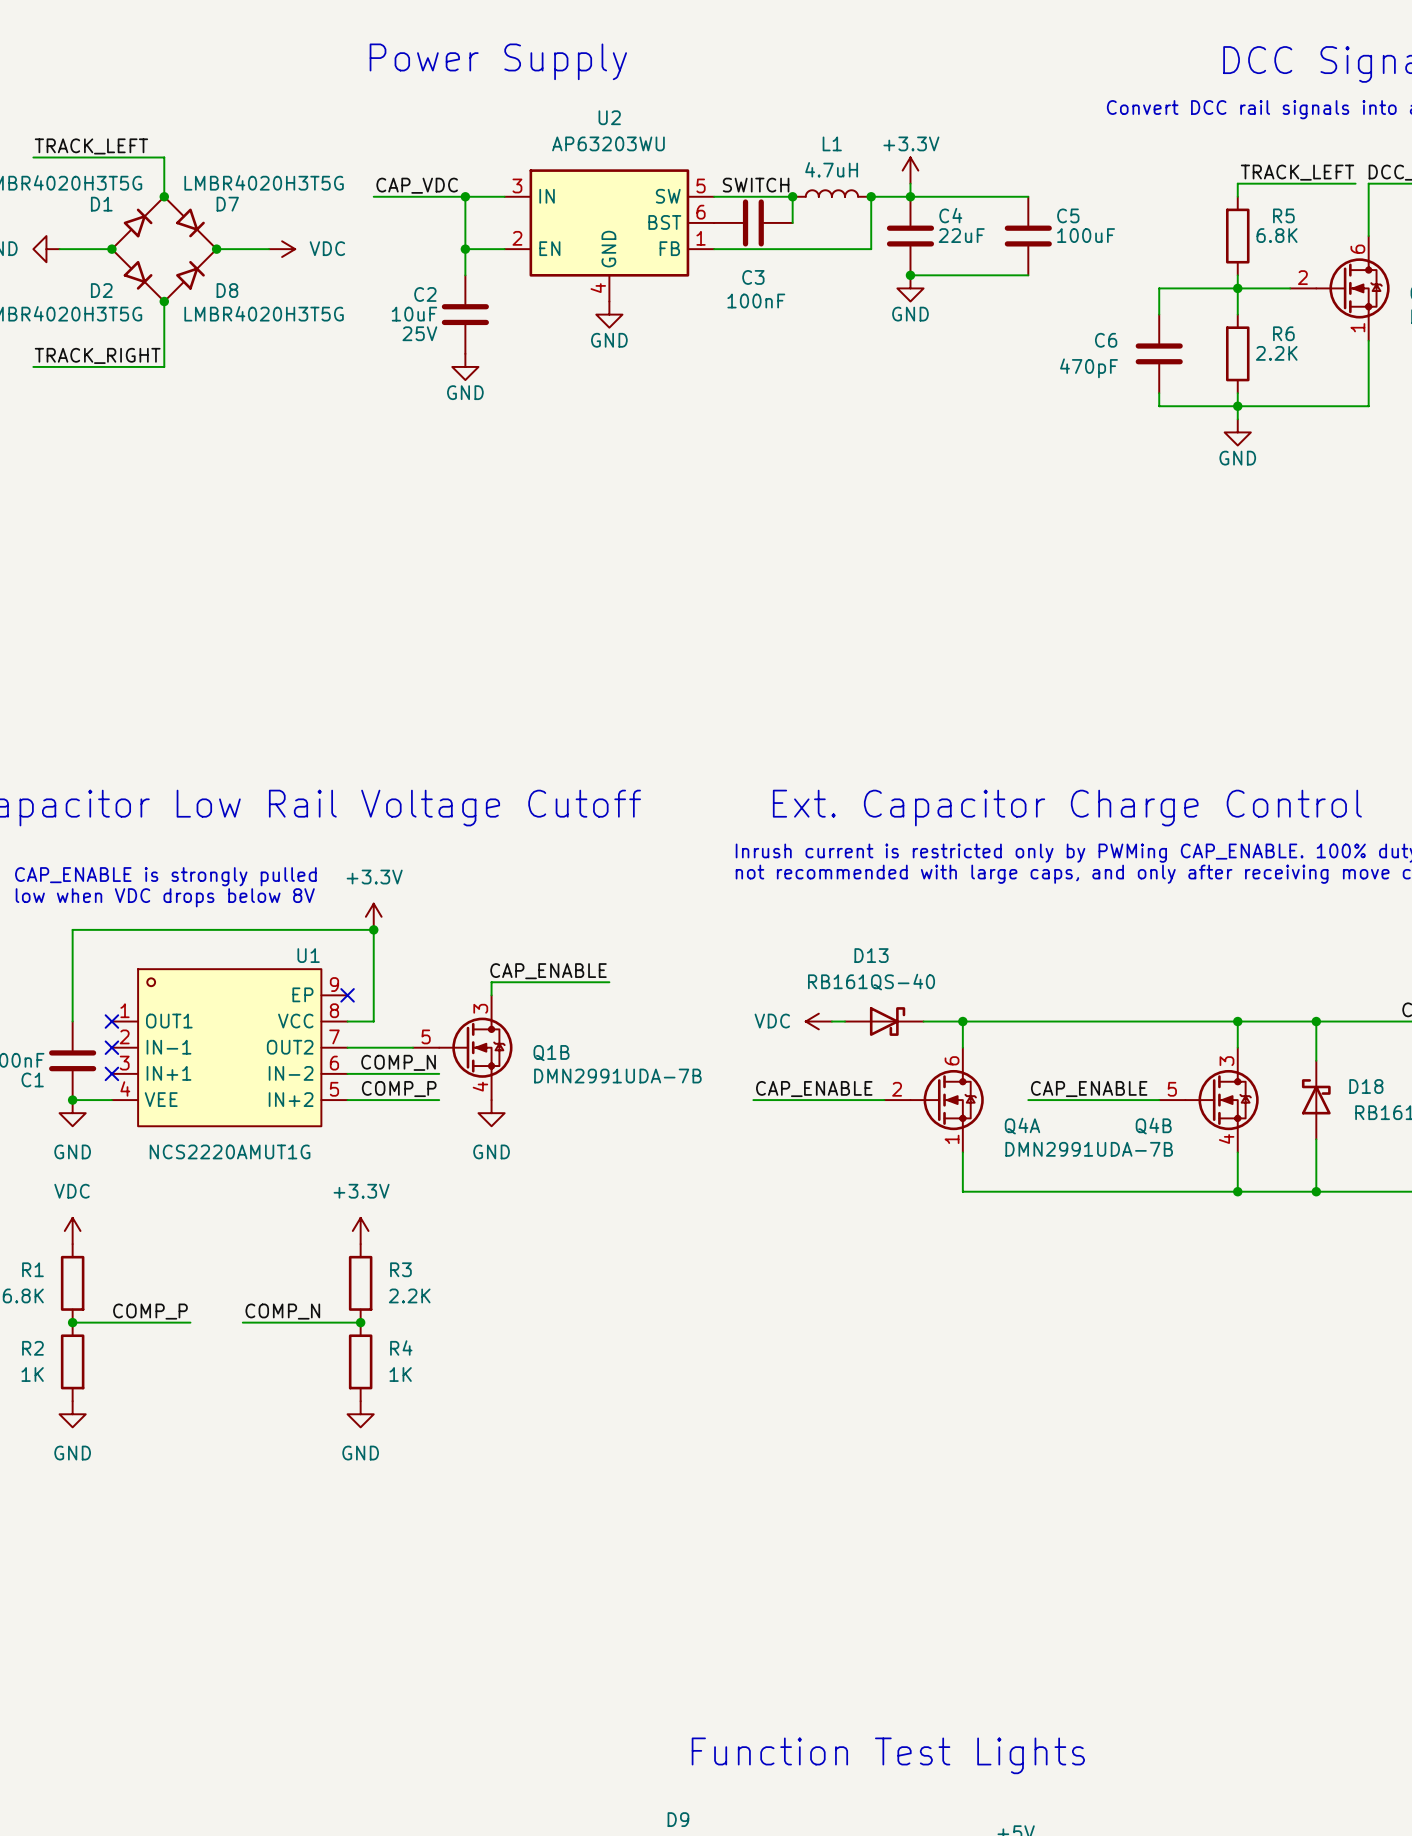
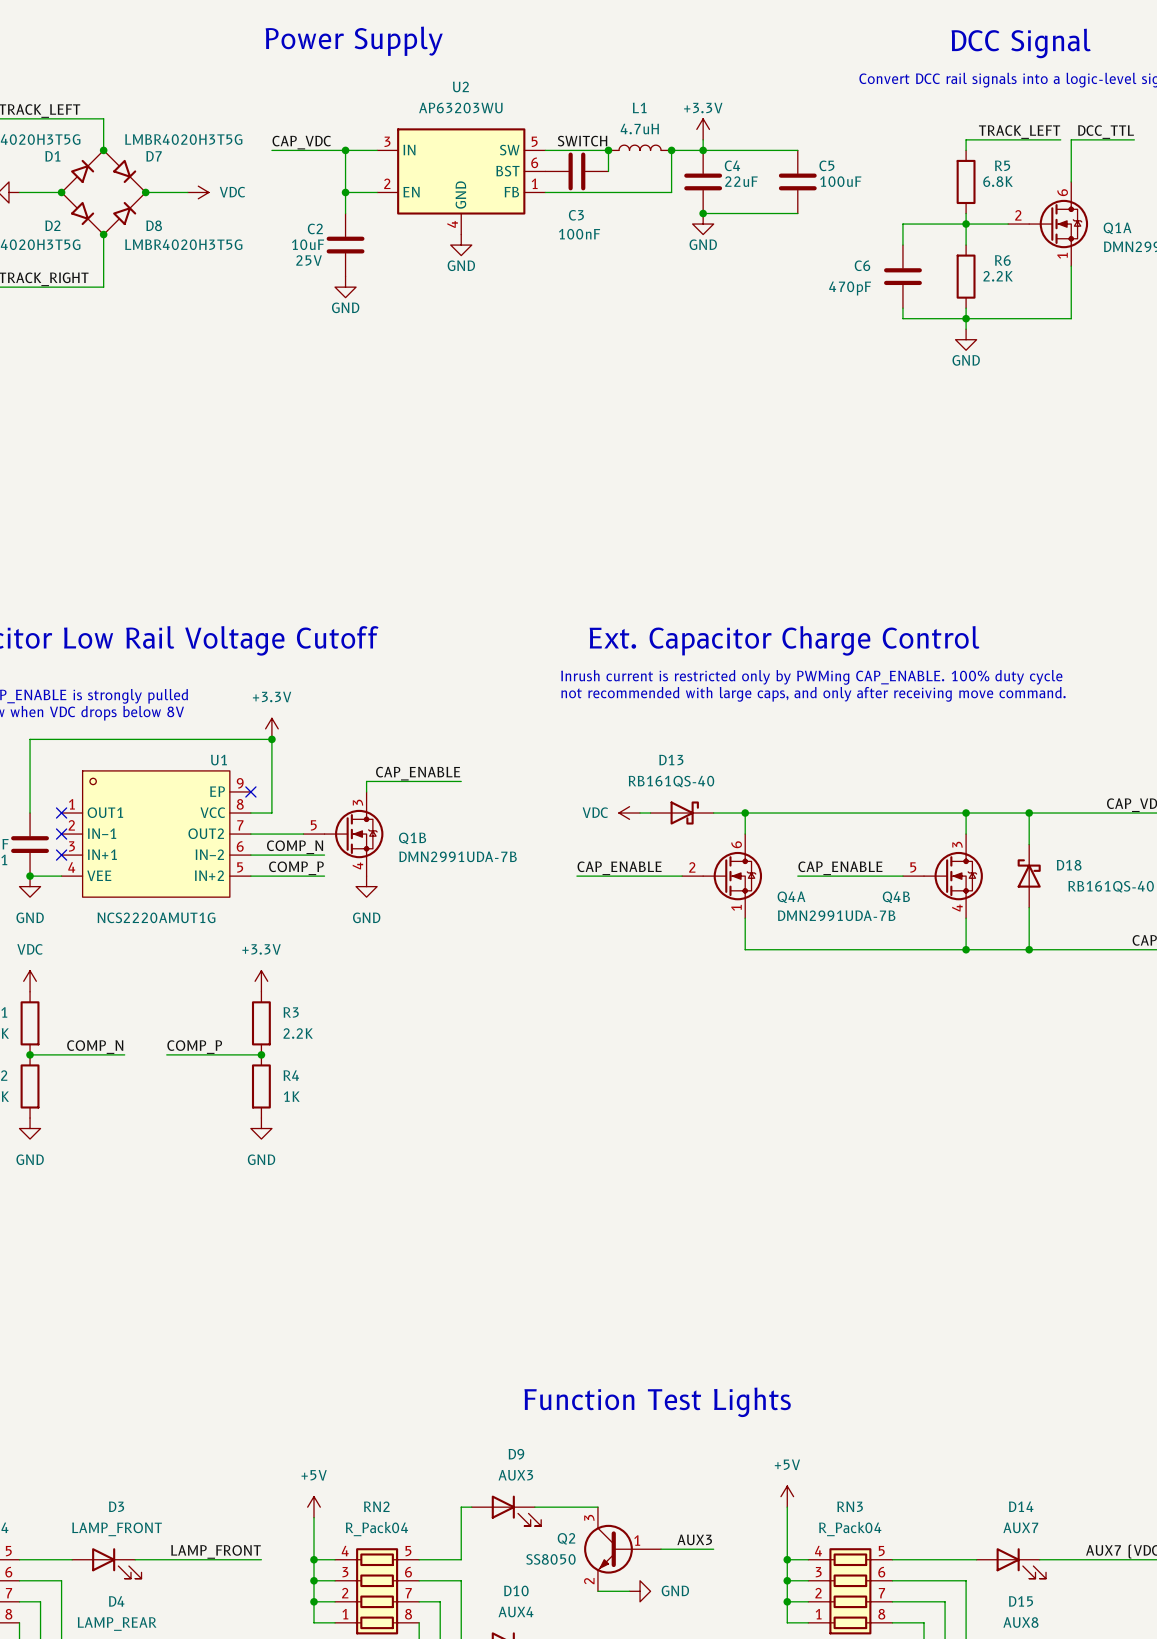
label: COMP_P (150, 1311) -> COMP_N (95, 1047)
label: COMP_N (282, 1311) -> COMP_P (194, 1047)

